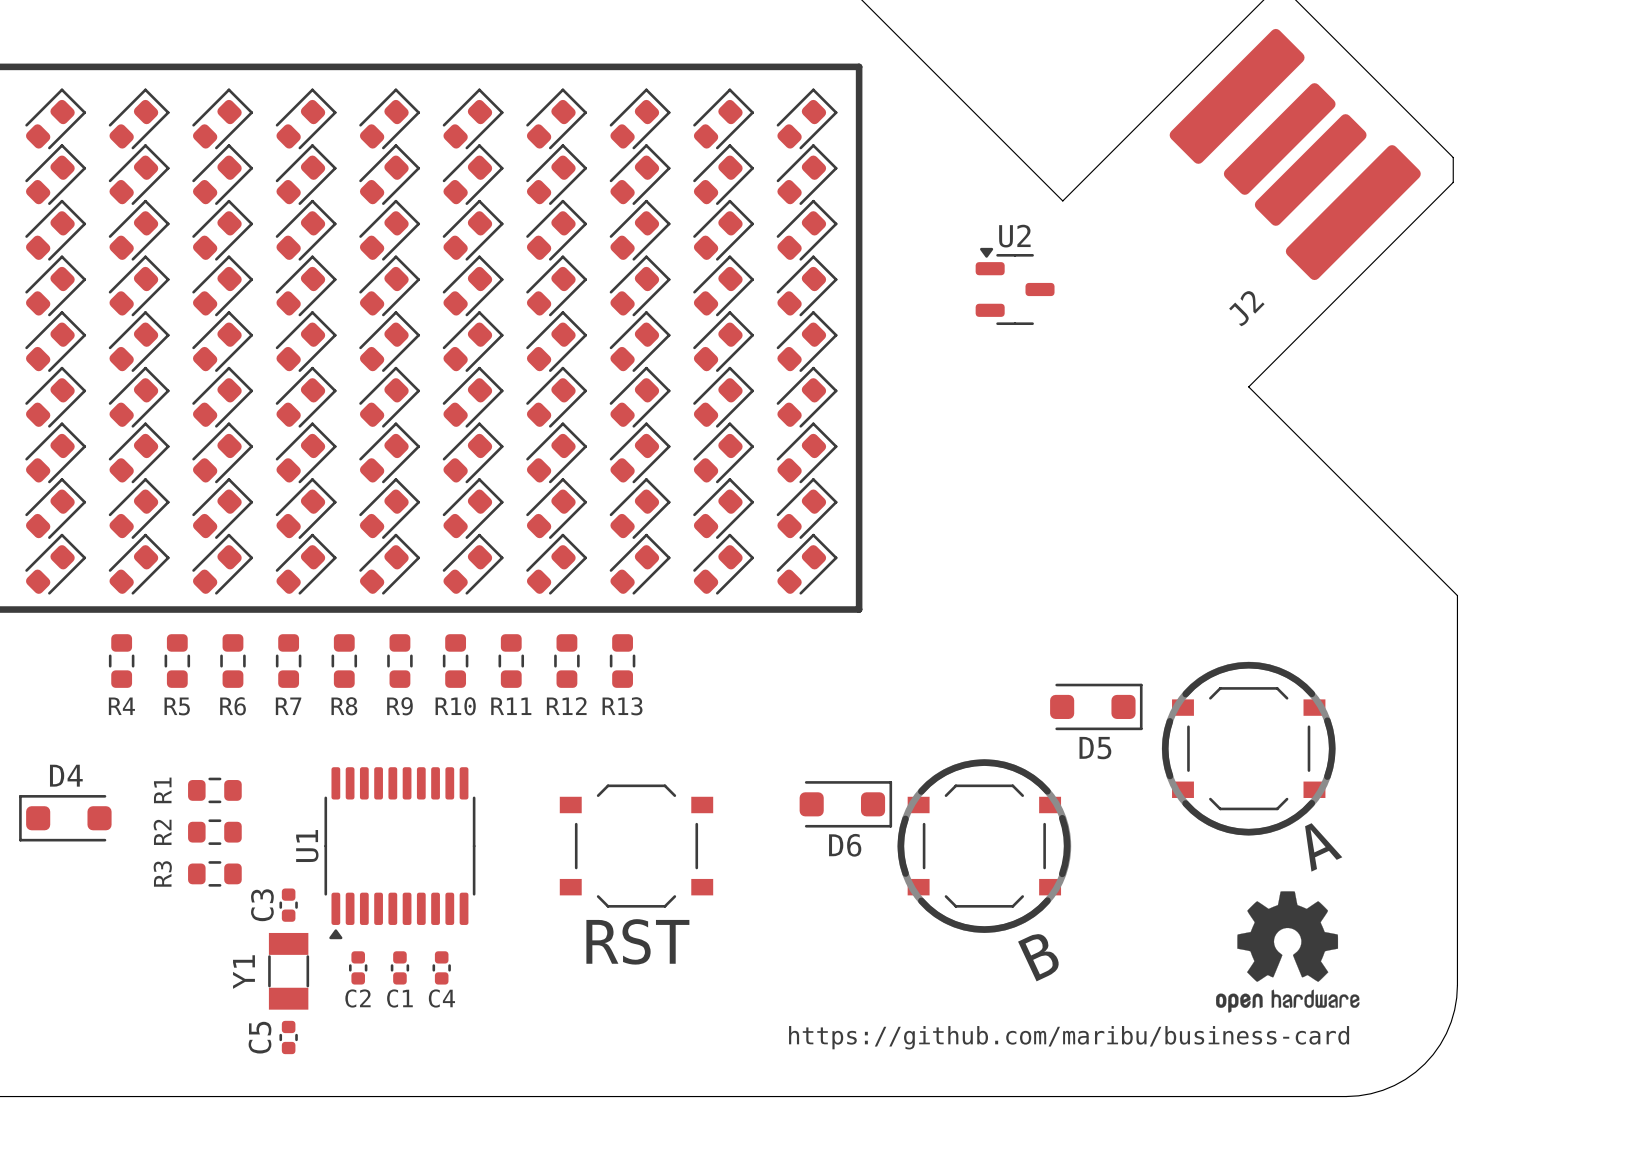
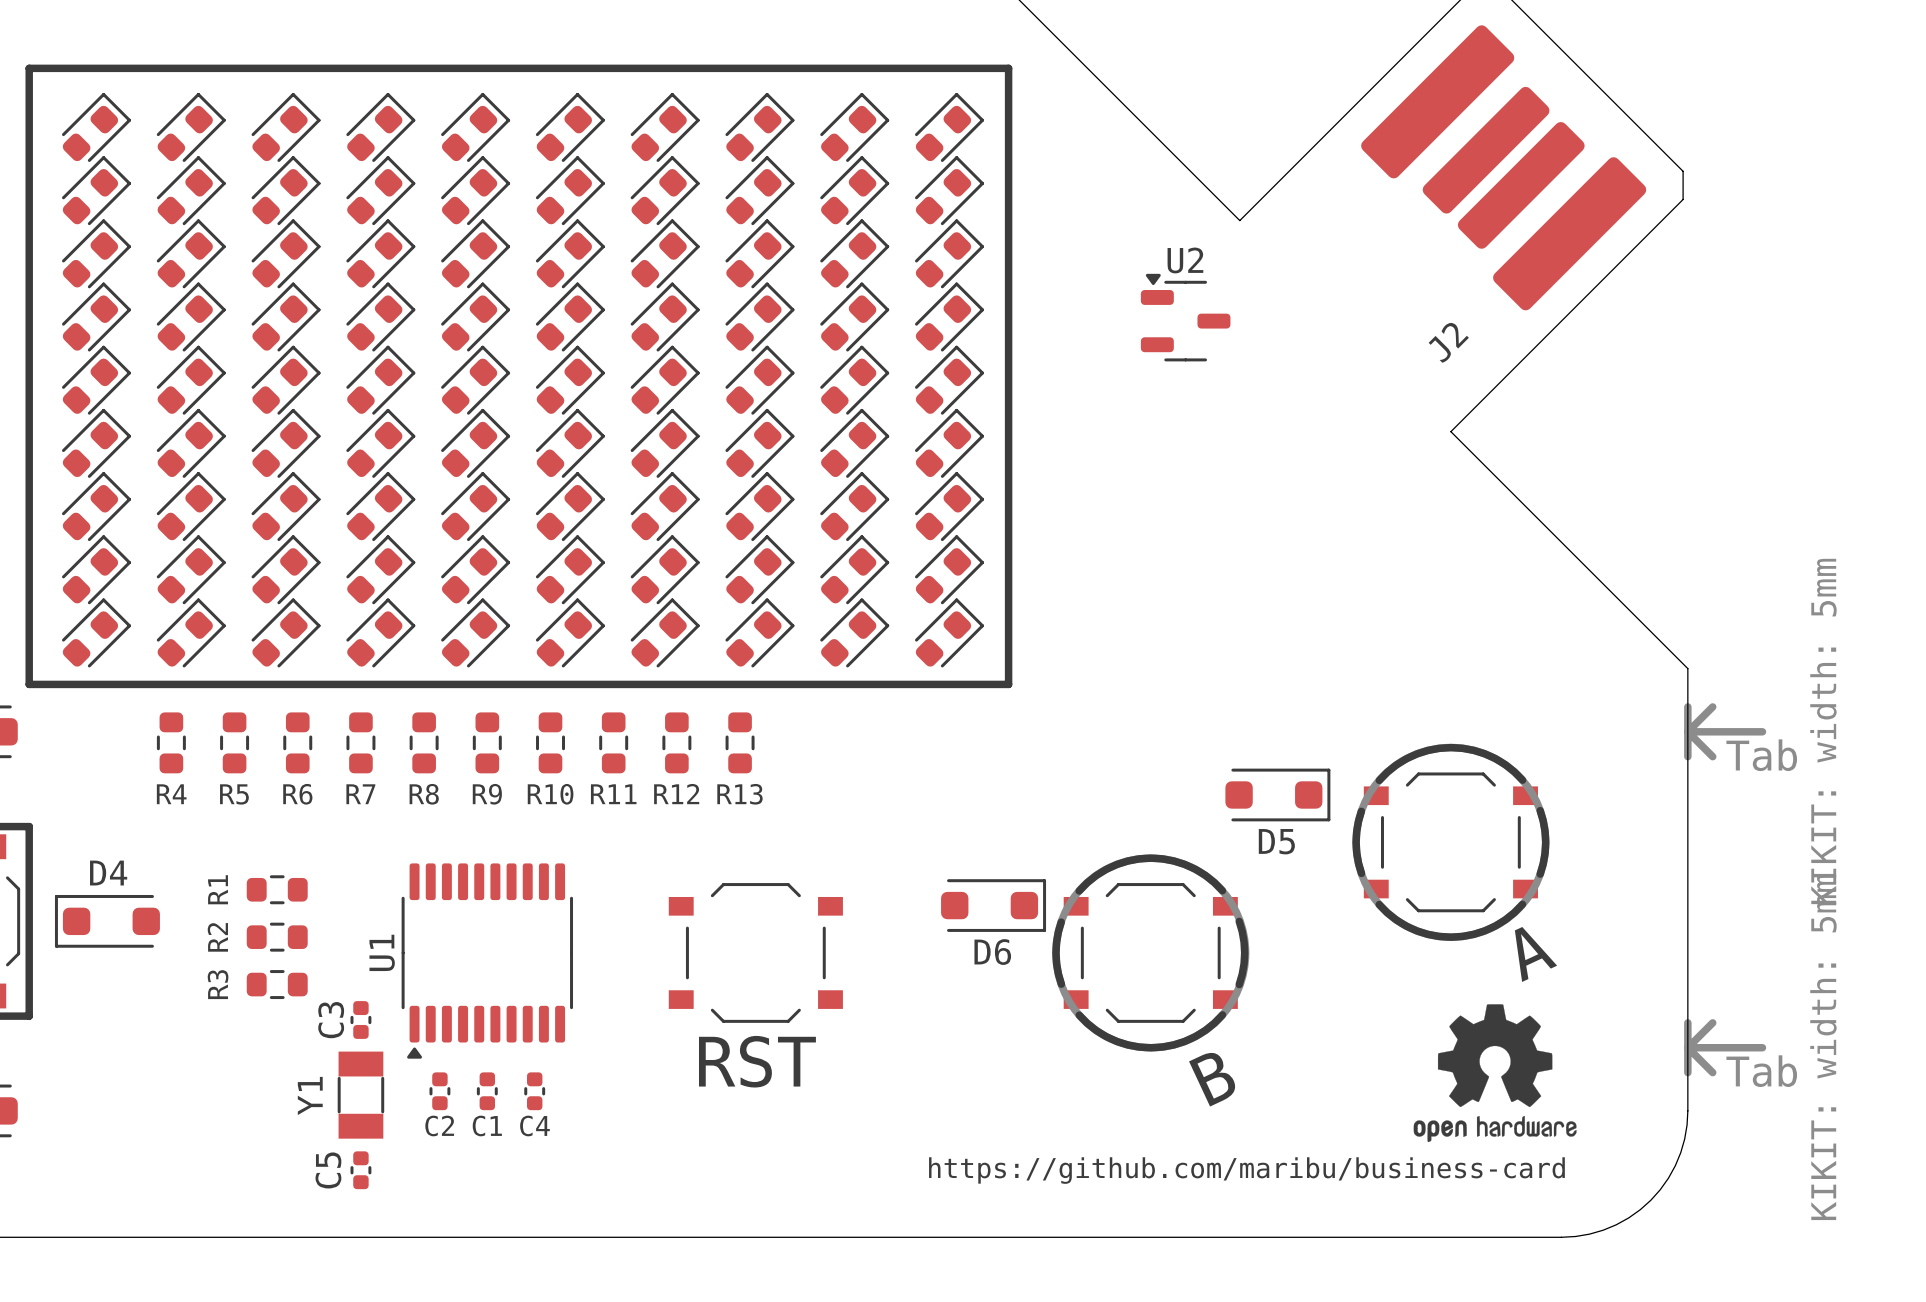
drawing: none -> [1684, 703, 1767, 1077]

